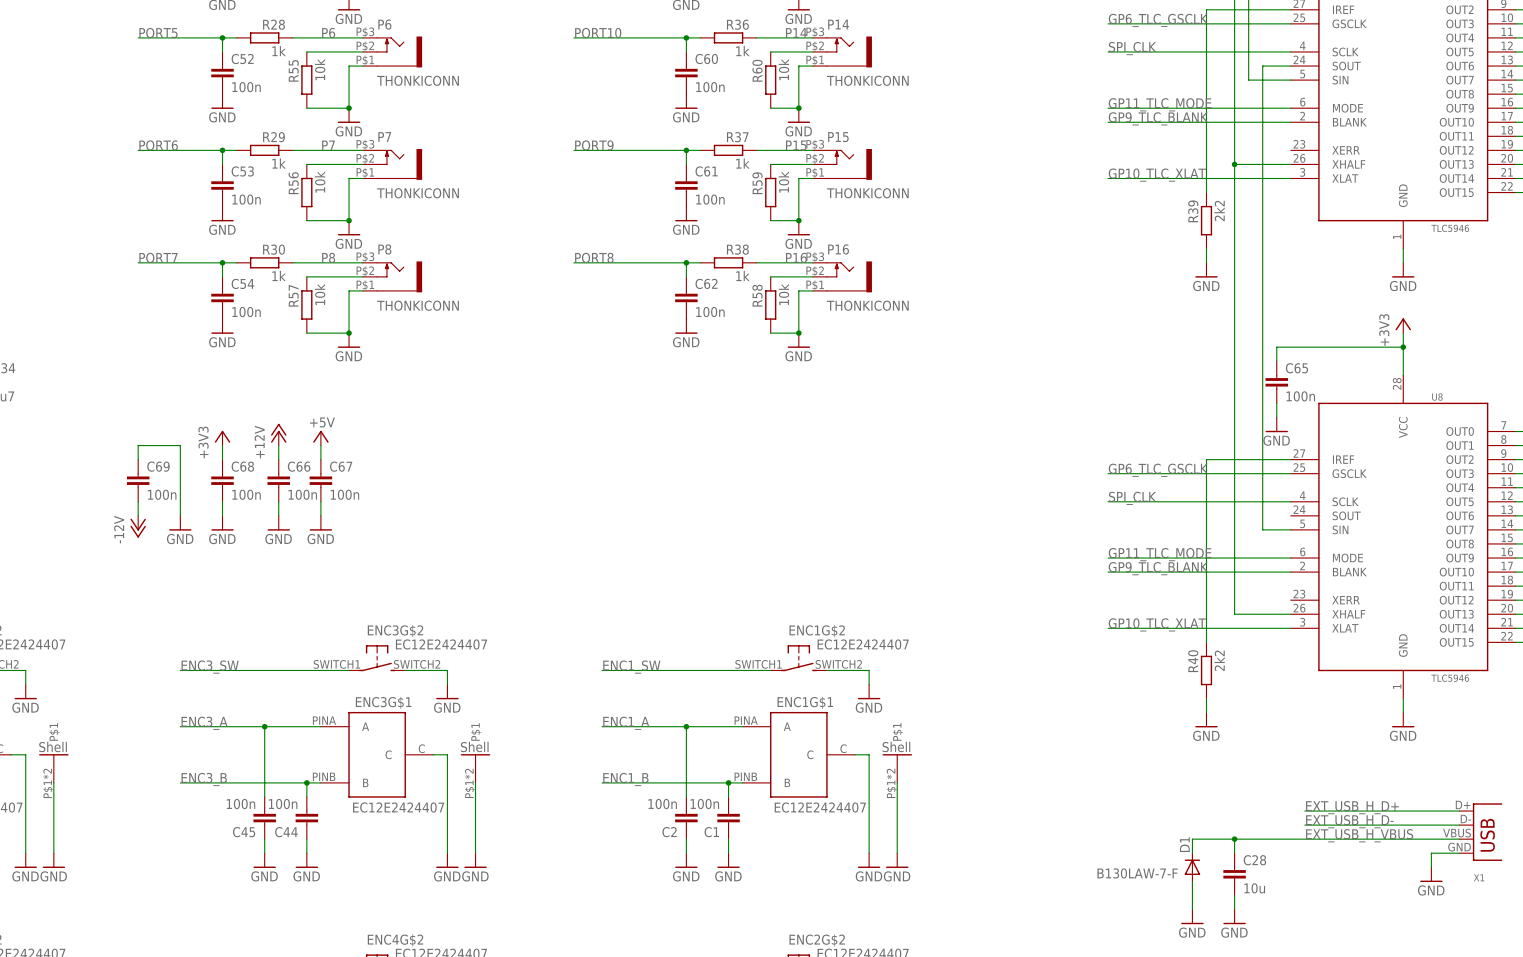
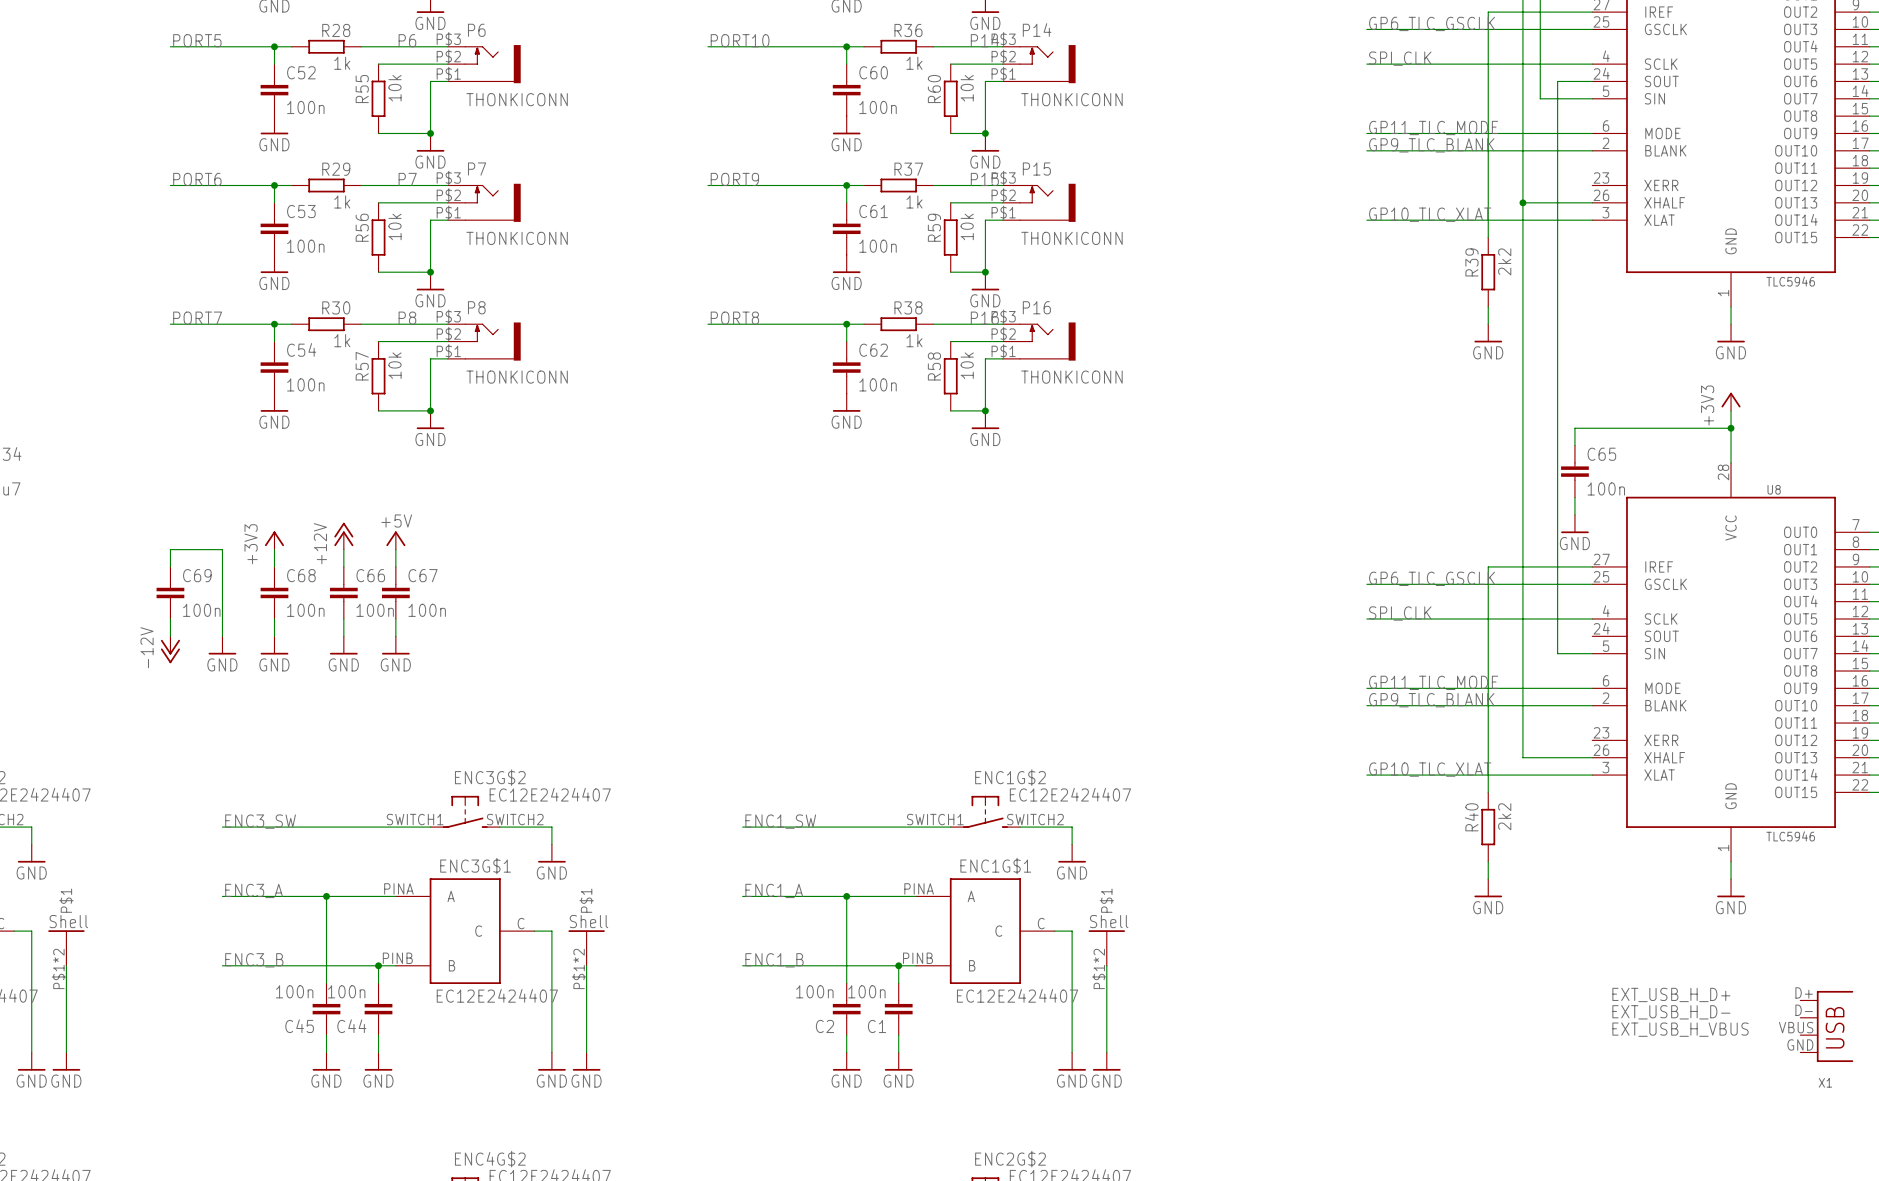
wire: (1304, 811) (1459, 811) -> none
wire: (1304, 825) (1459, 825) -> none
wire: (1234, 839) (1234, 853) -> none
junction: (1234, 839) -> none
wire: (1459, 839) (1192, 839) (1192, 853) -> none
wire: (1459, 853) (1431, 853) (1431, 867) -> none
D1: B130LAW-7-F (1192, 867) -> none
C28: 10u (1234, 874) -> none
power symbol: GND (1431, 874) -> none
wire: (1192, 881) (1192, 909) -> none
wire: (1234, 895) (1234, 909) -> none
power symbol: GND (1192, 916) -> none
power symbol: GND (1234, 916) -> none

